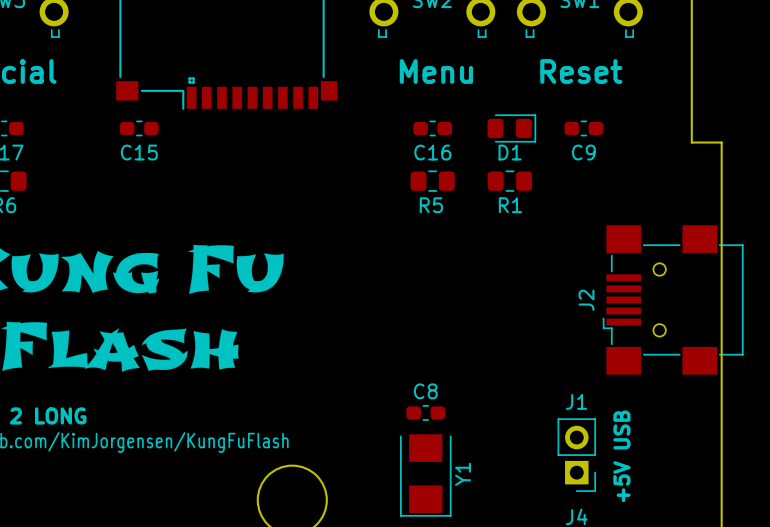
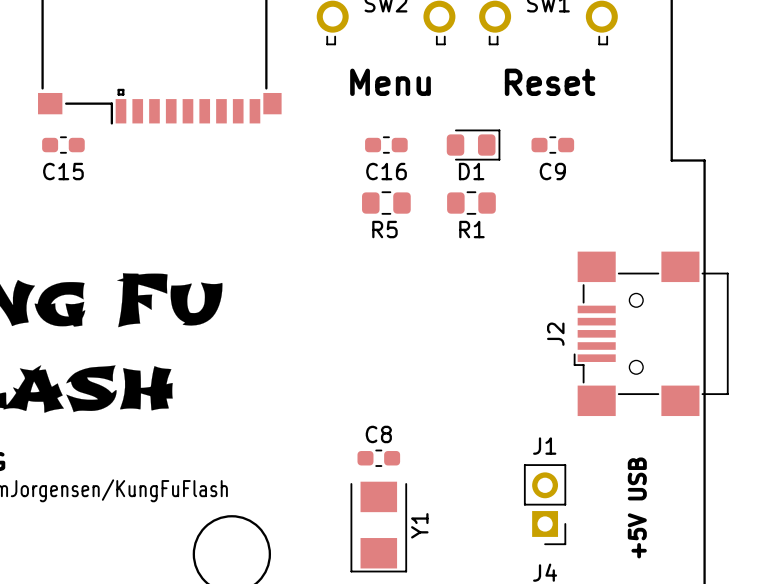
text position: +5V USB (621, 456) -> +5V USB (637, 507)

